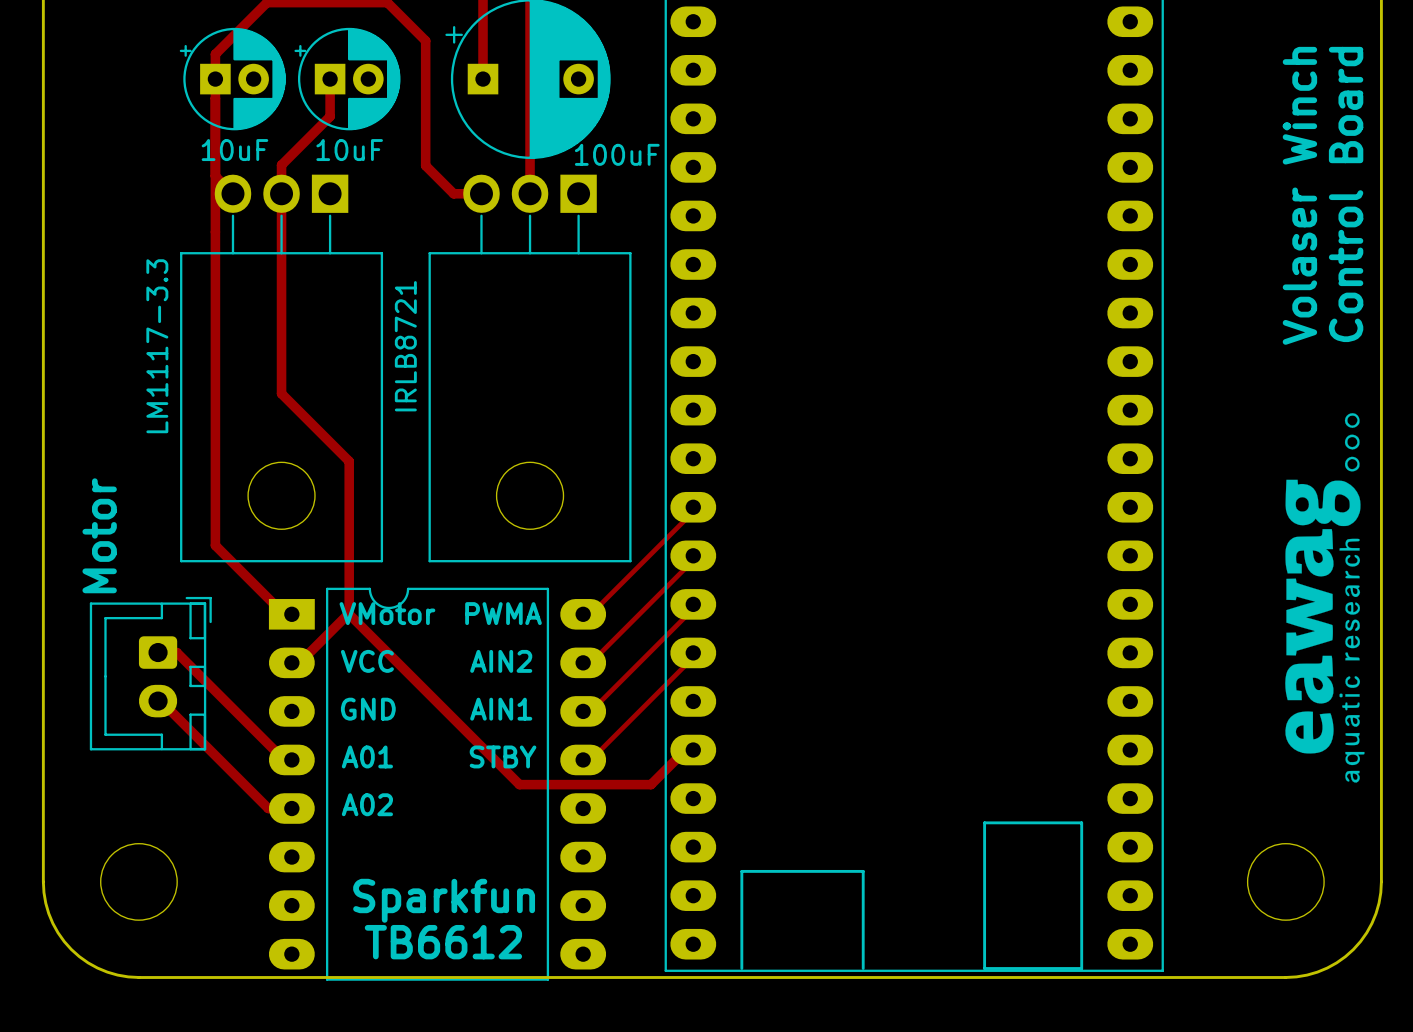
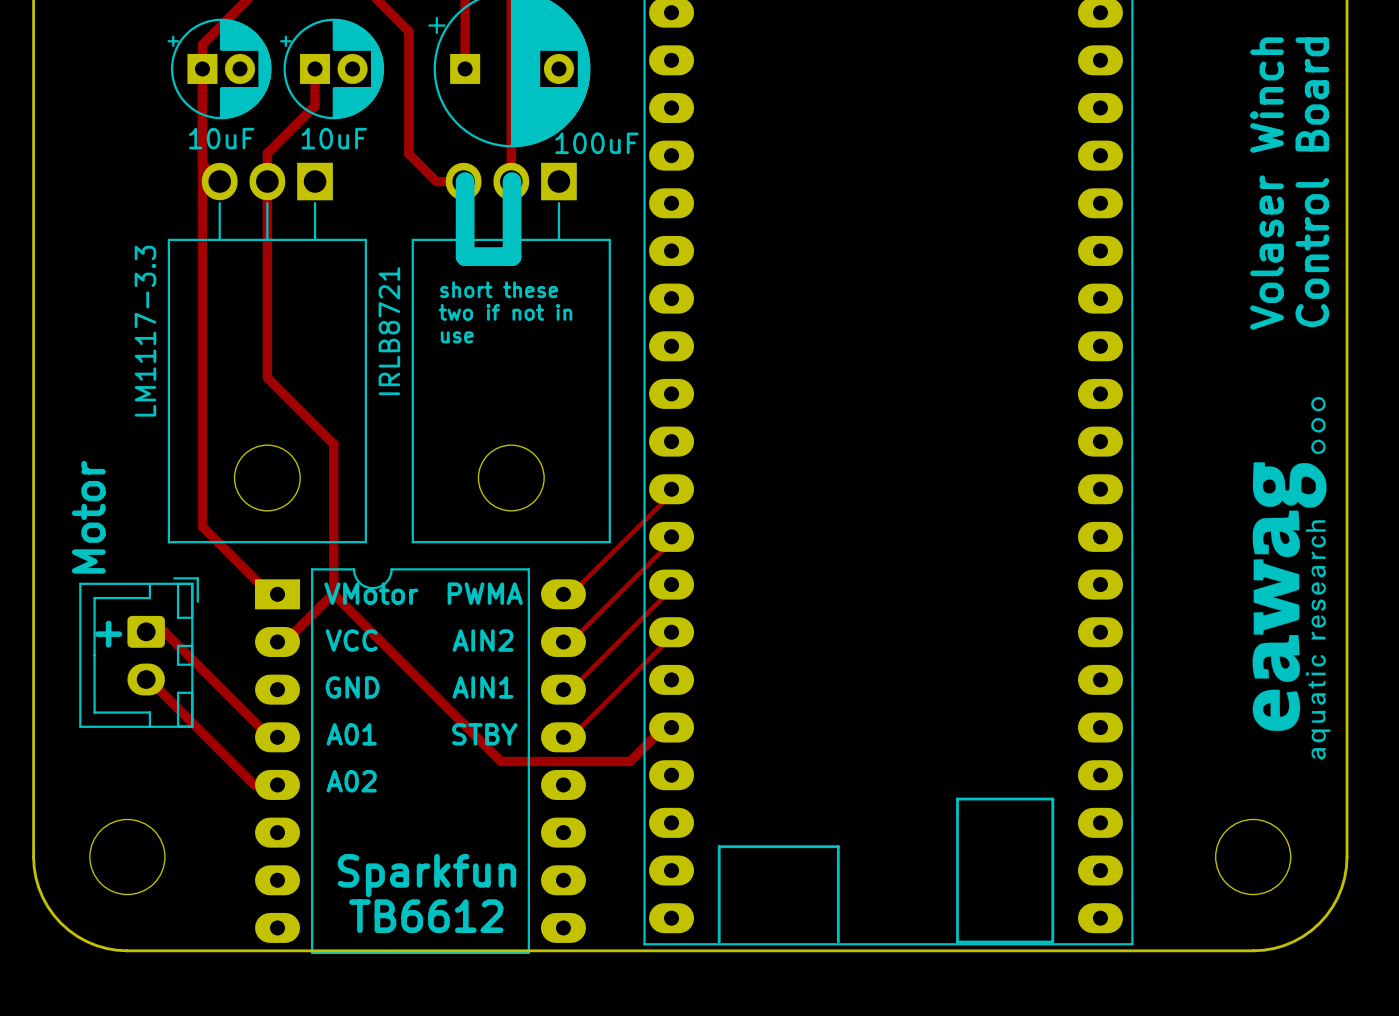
line: none -> (465, 181) (465, 256) (512, 256) (512, 181)
text: none -> short these (499, 289)
text: none -> two if not in (505, 312)
text: none -> use (457, 337)
text: none -> + (108, 634)

